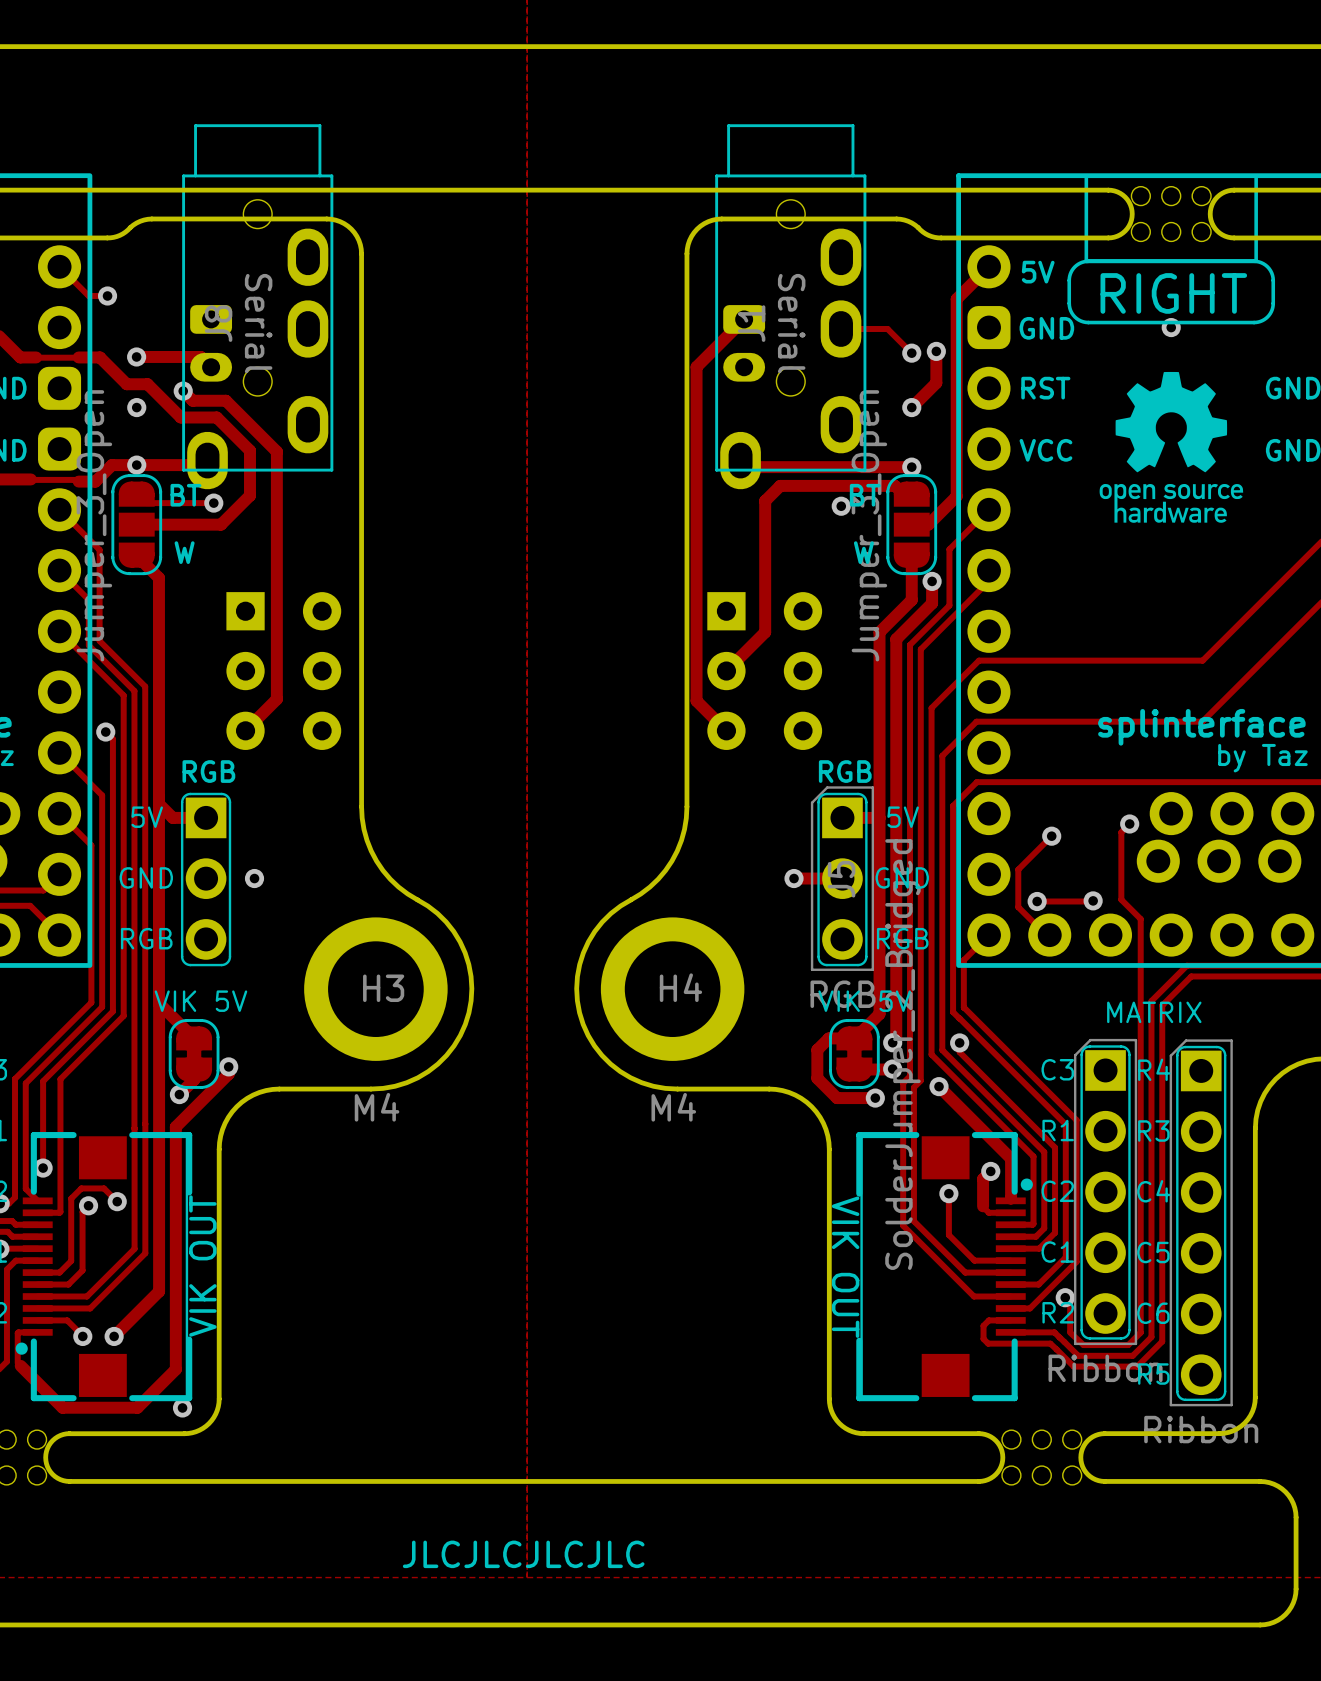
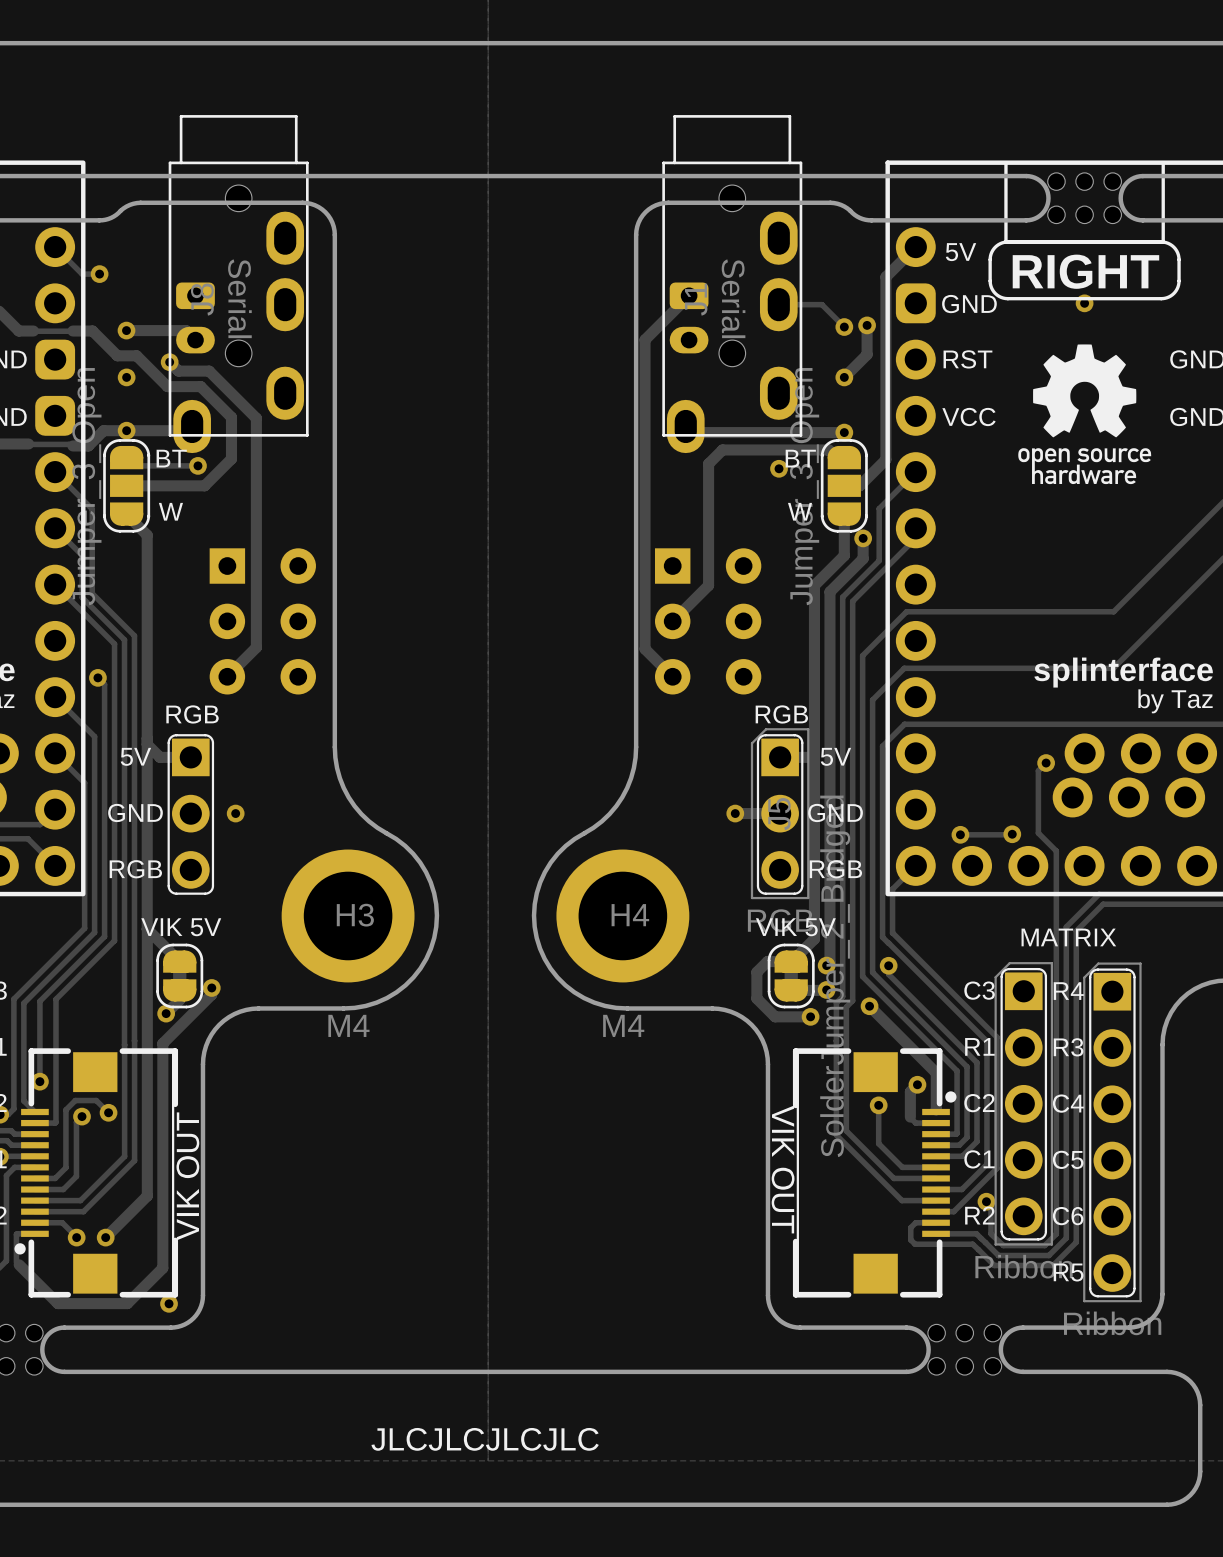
track: (1051, 836) (1018, 869) (1018, 907) (1046, 935) (1049, 935) -> none
via: (1051, 836) -> none

